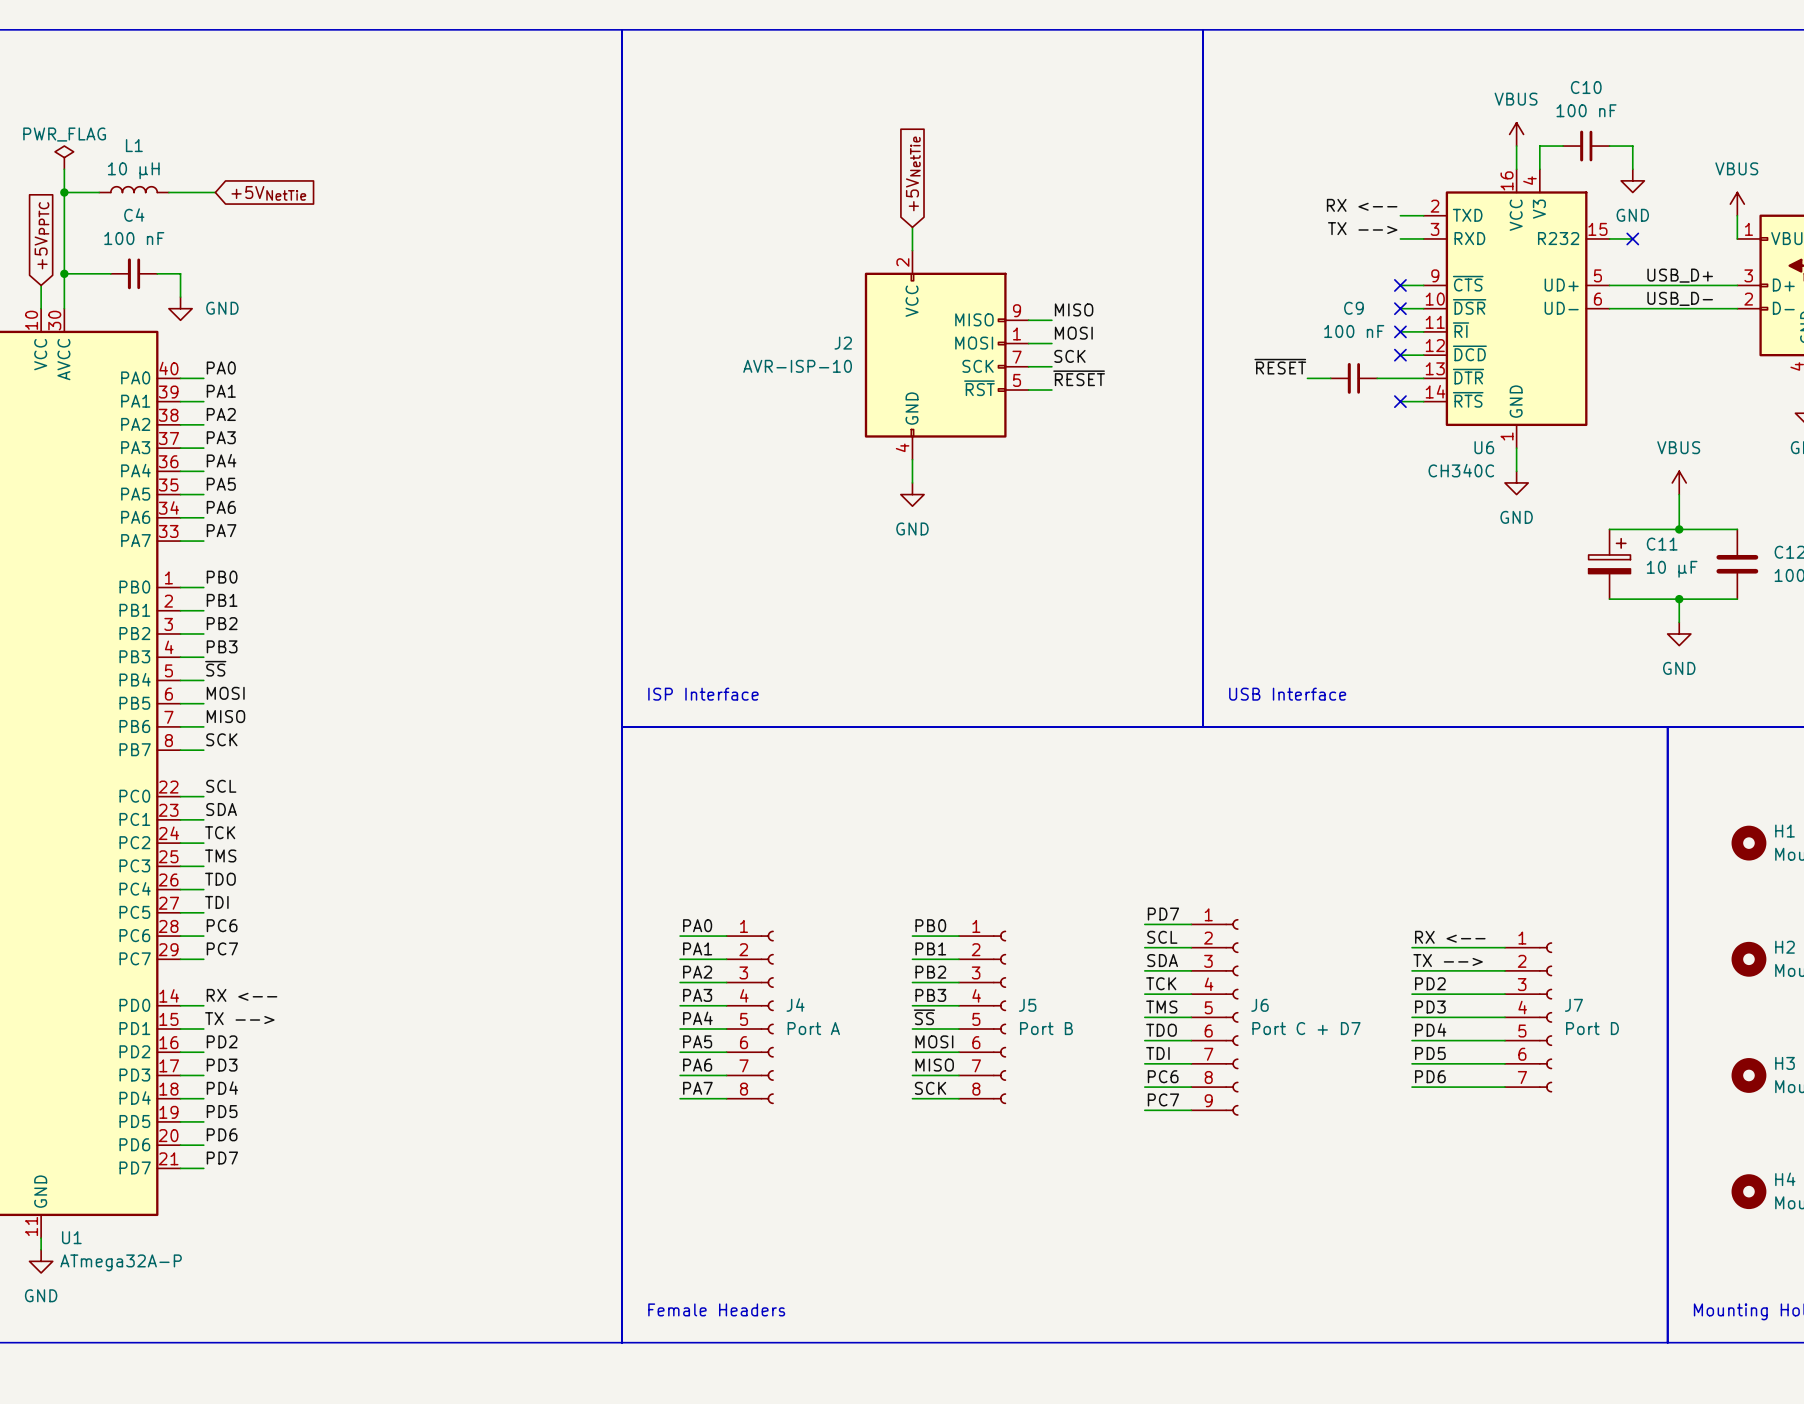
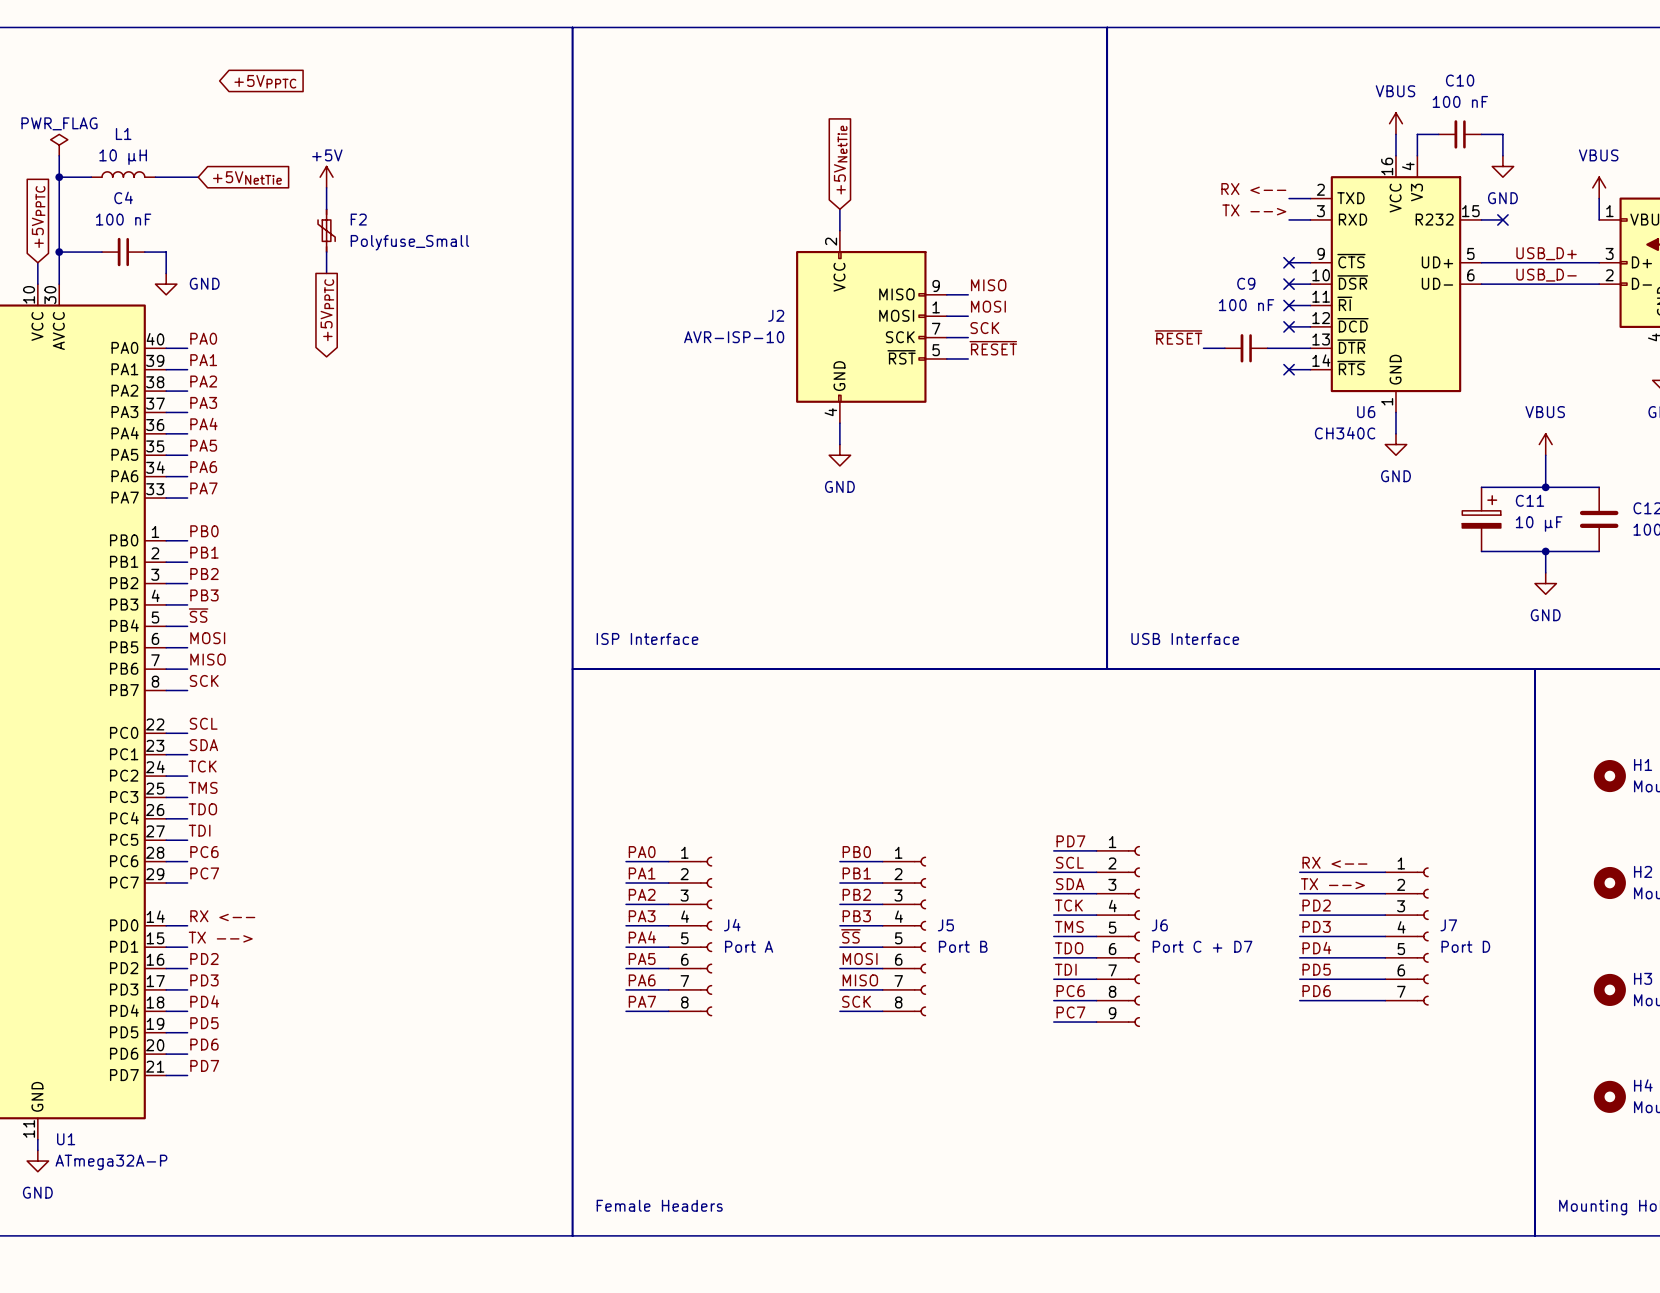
global label: none -> +5VPPTC (265, 81)
power symbol: none -> +5V (326, 177)
wire: none -> (326, 187) (326, 209)
F2: none -> Polyfuse_Small (326, 230)
wire: none -> (326, 252) (326, 273)
global label: none -> +5VPPTC (327, 310)

